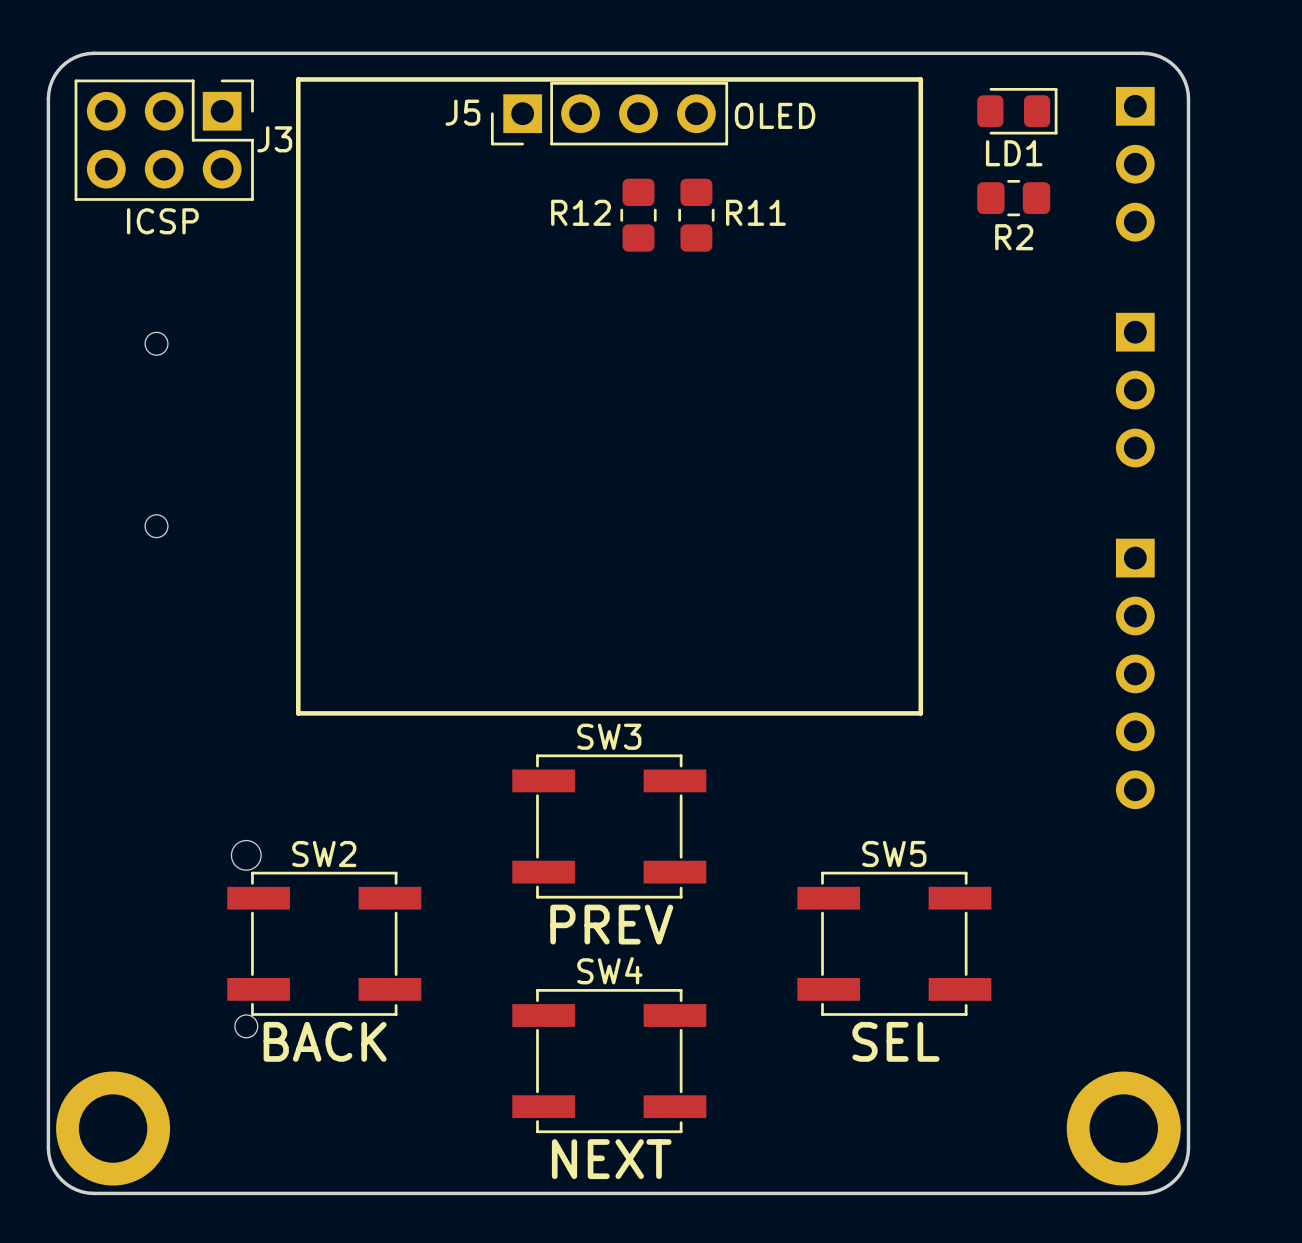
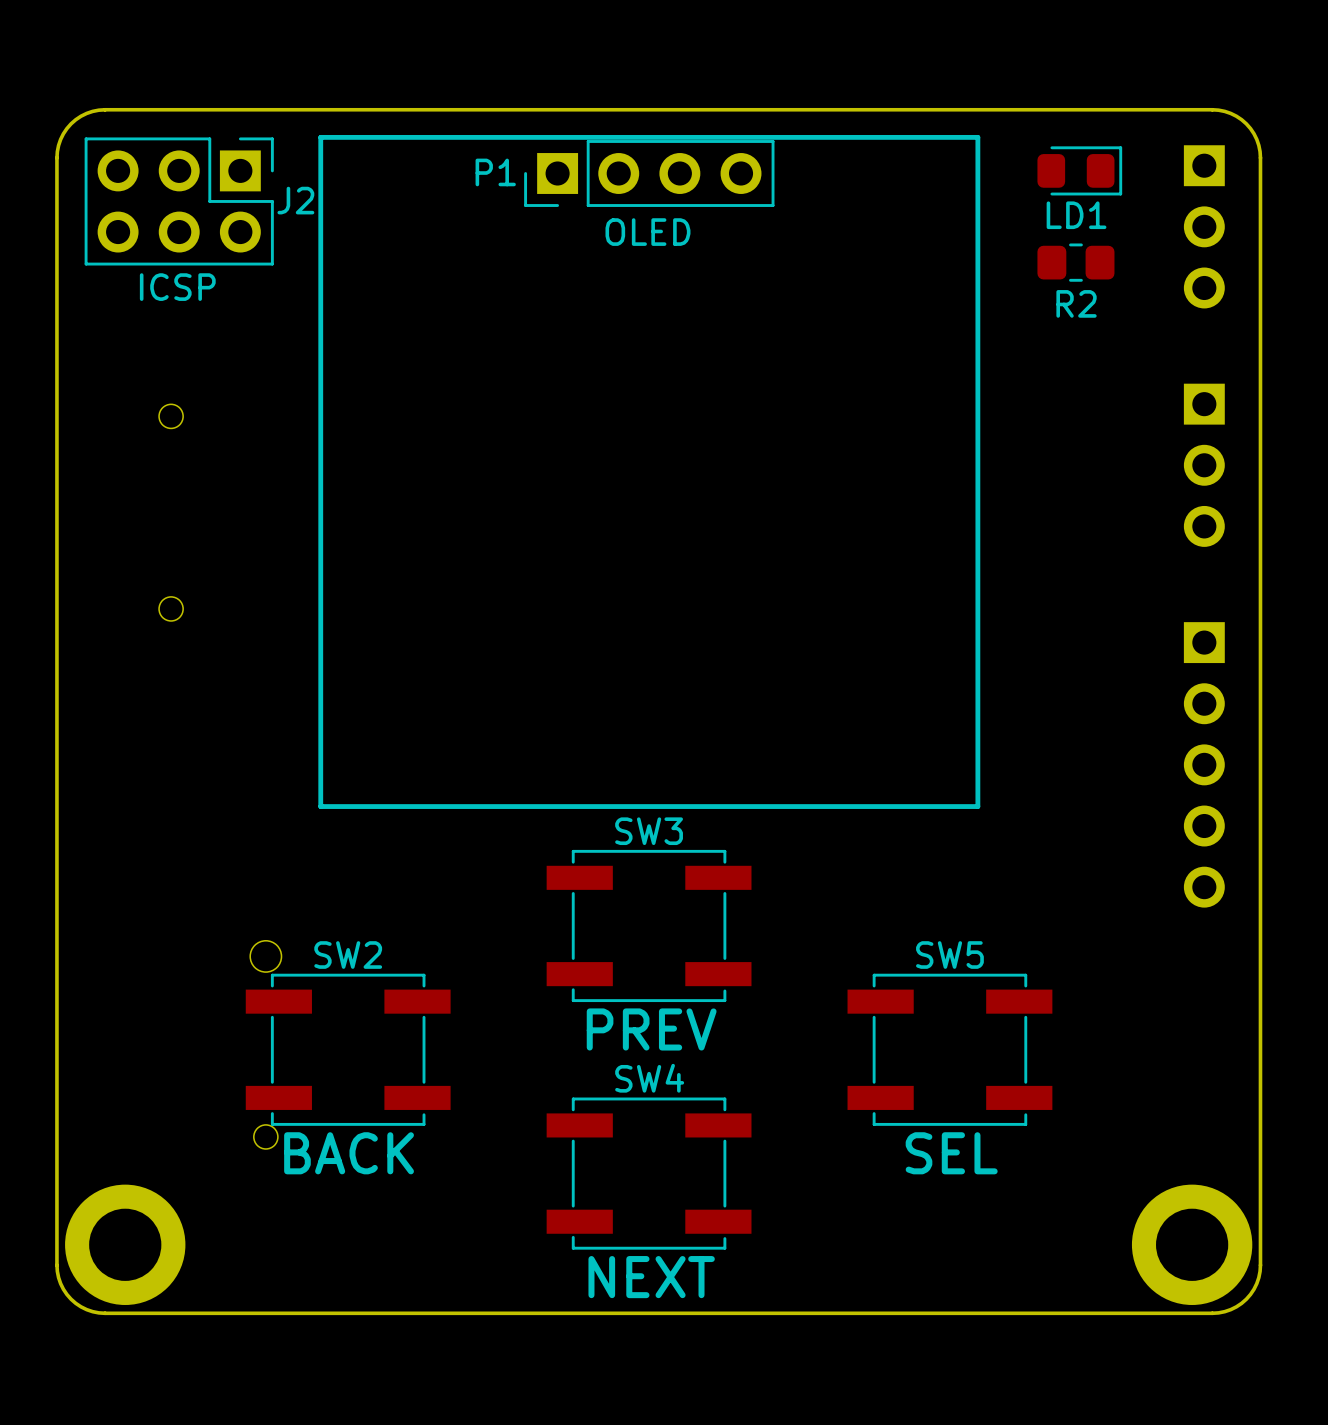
J5 name: J5 (462, 112) -> P1 (495, 172)
text position: OLED (775, 115) -> OLED (647, 232)
J3 name: J3 (274, 139) -> J2 (295, 200)
R12: (638, 215) -> none
R11: (696, 215) -> none

